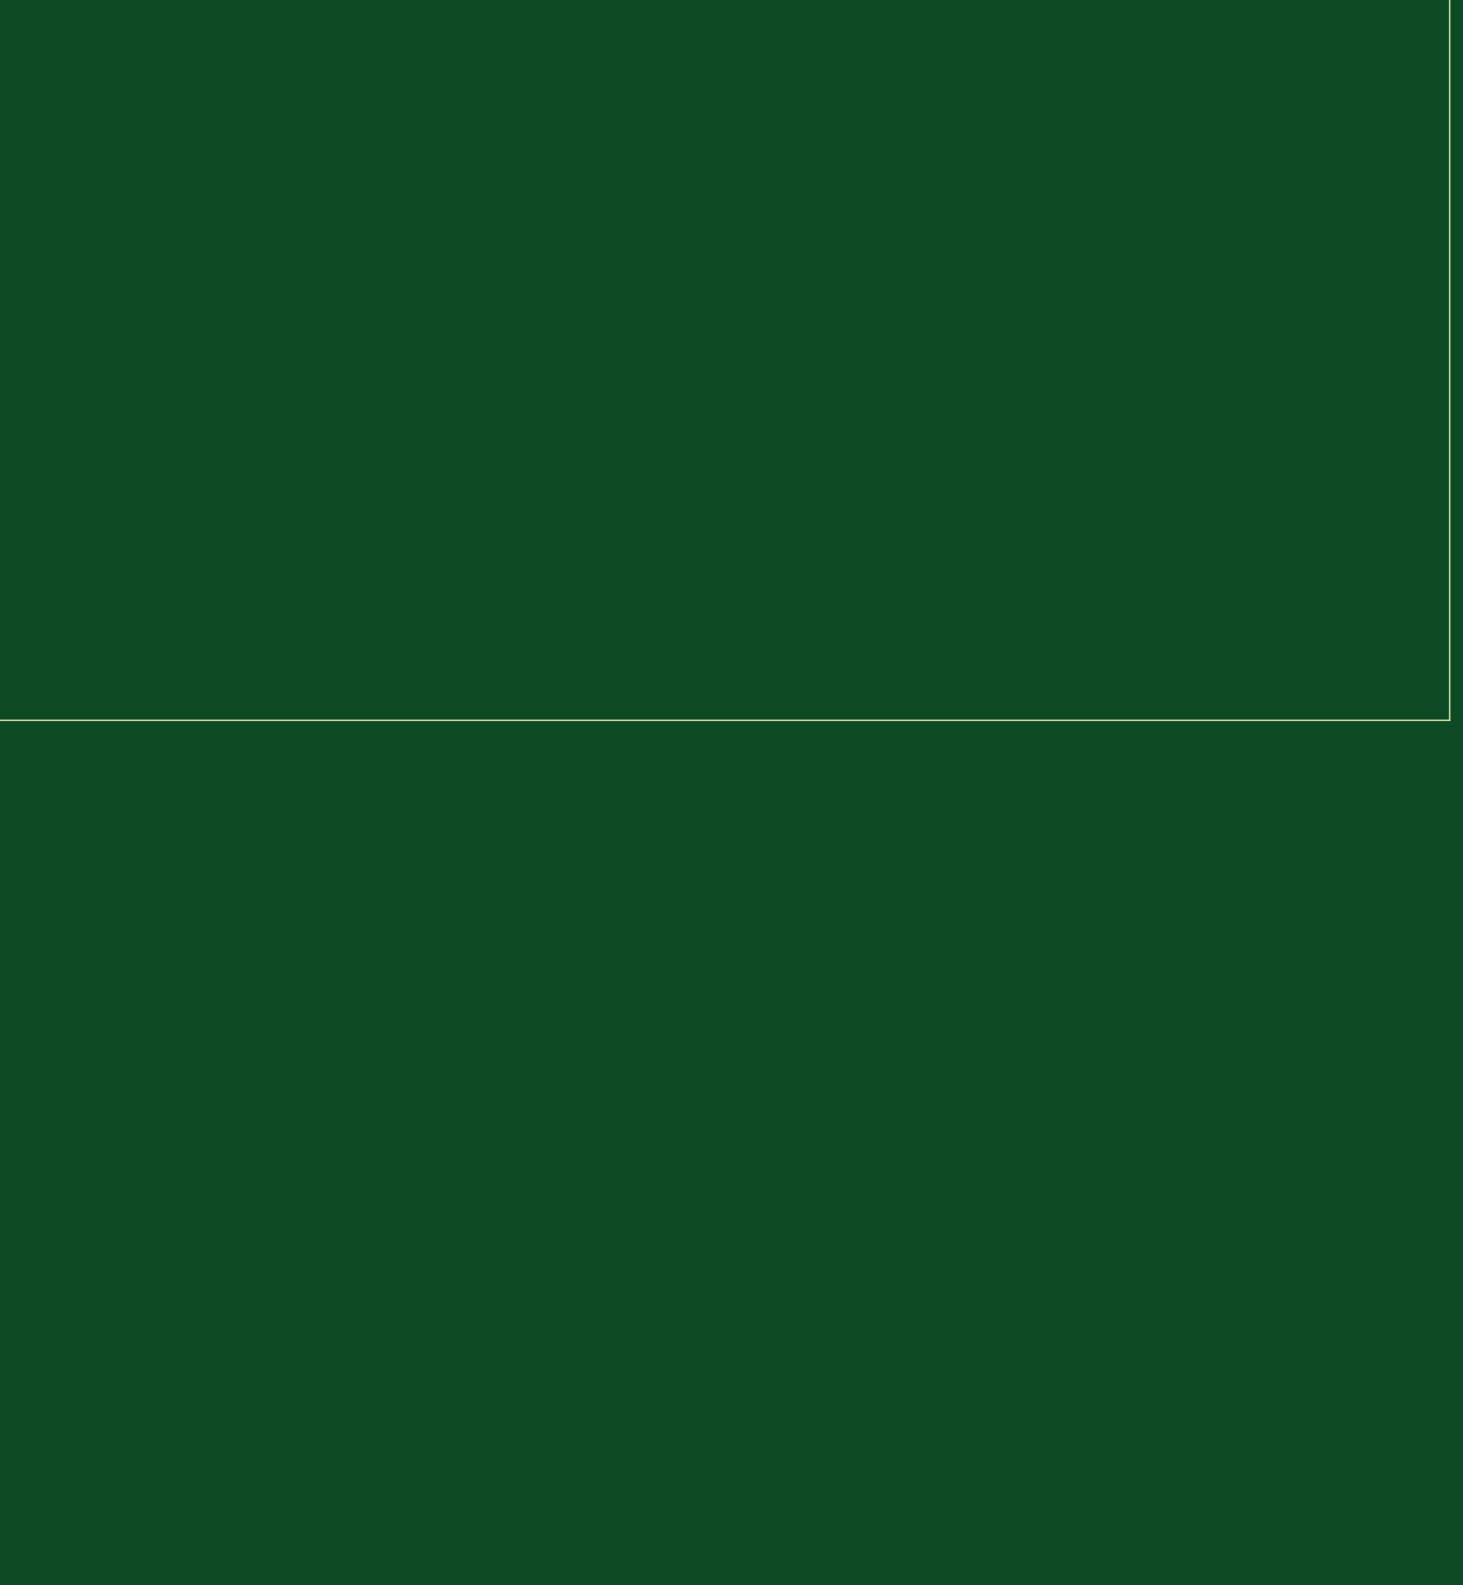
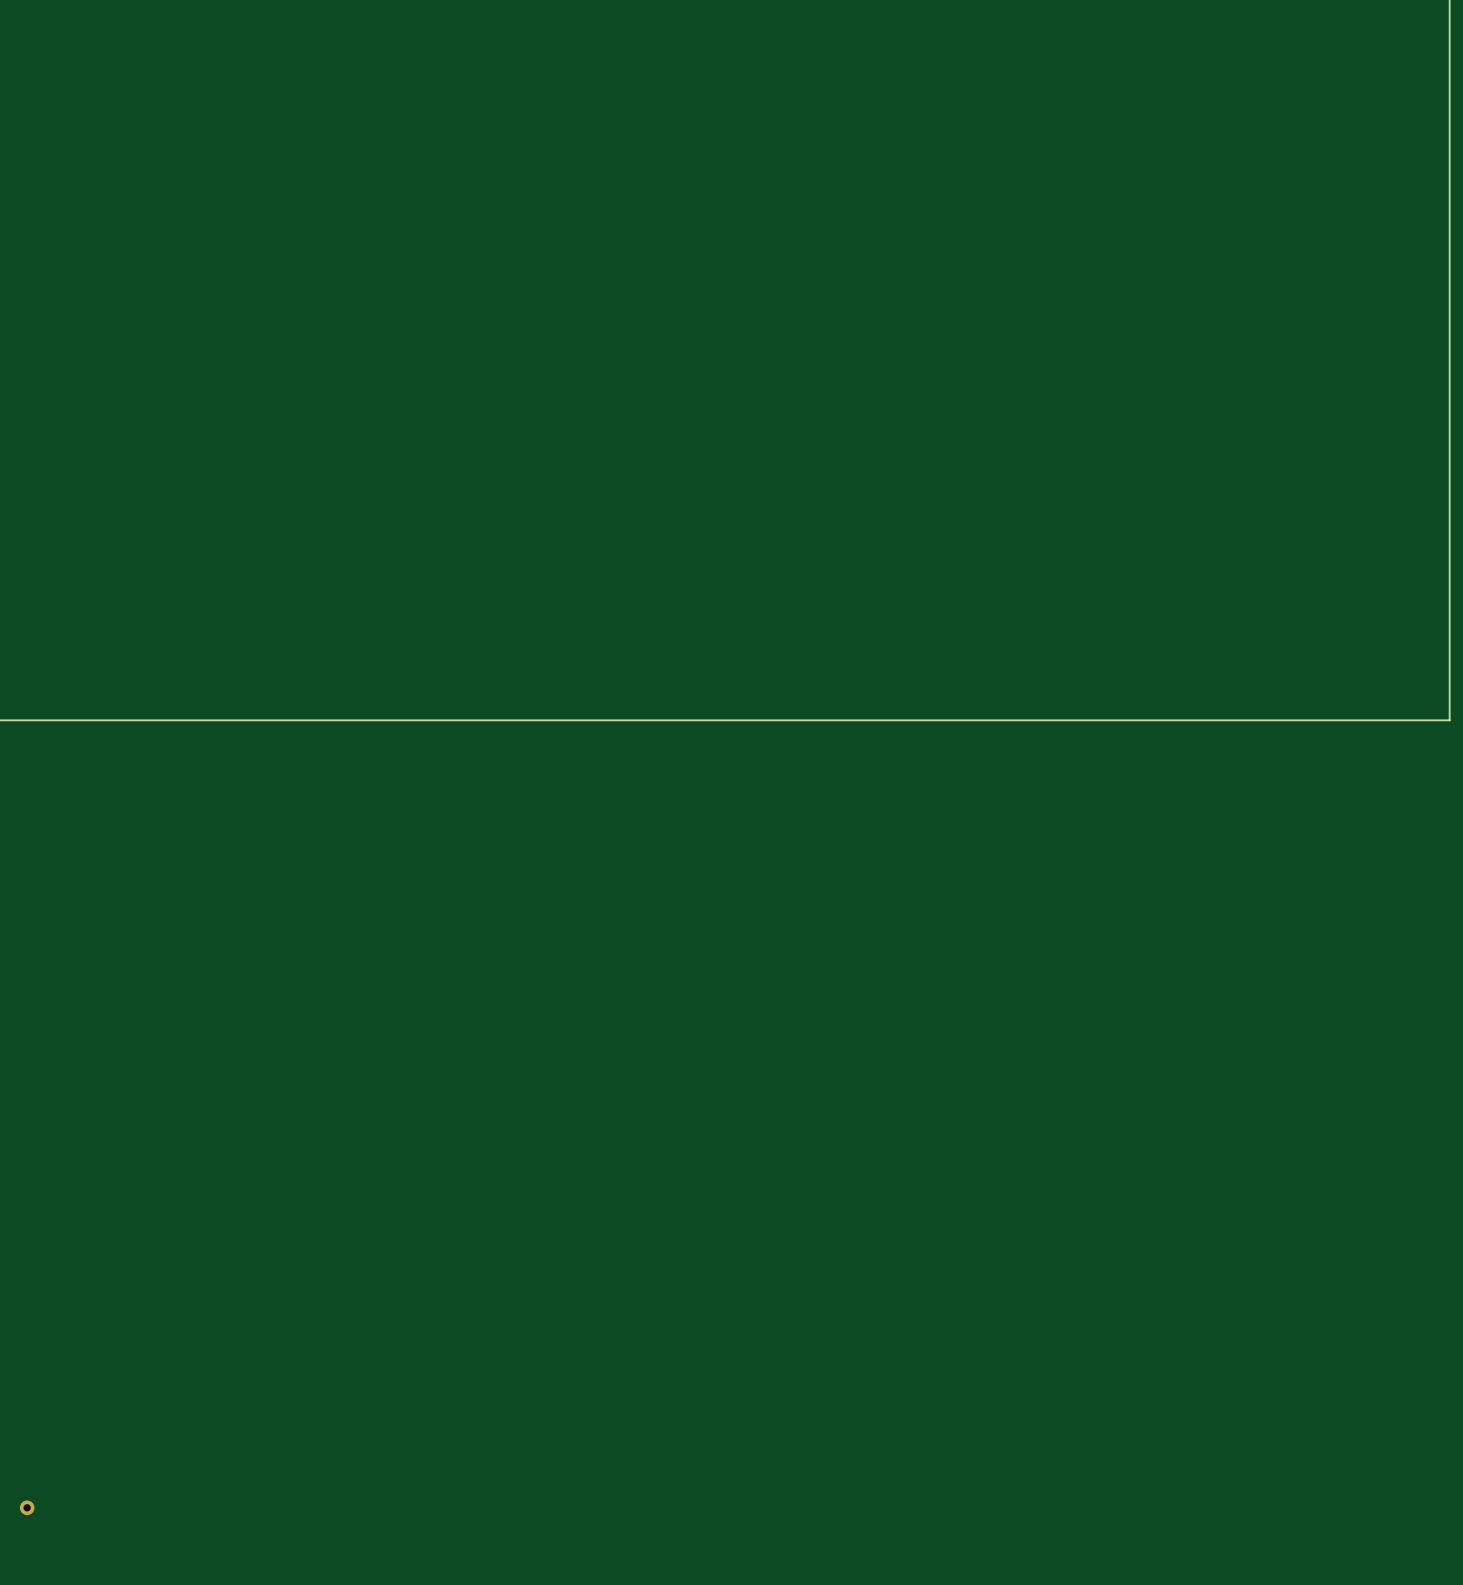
via: none -> (27, 1507)

